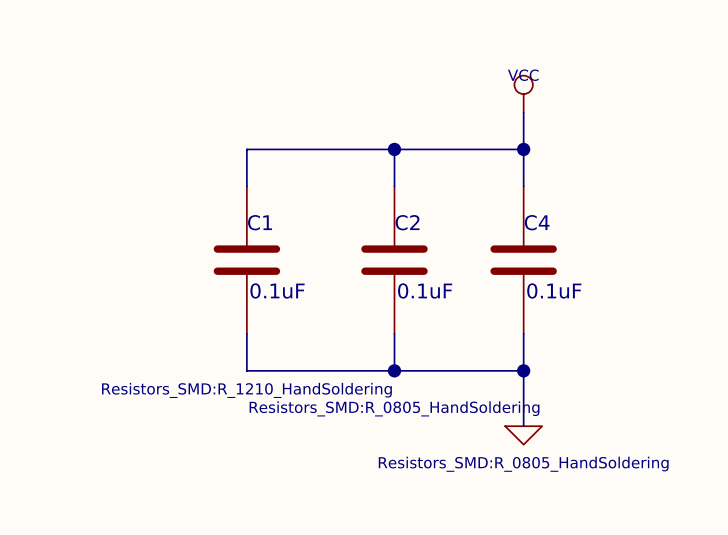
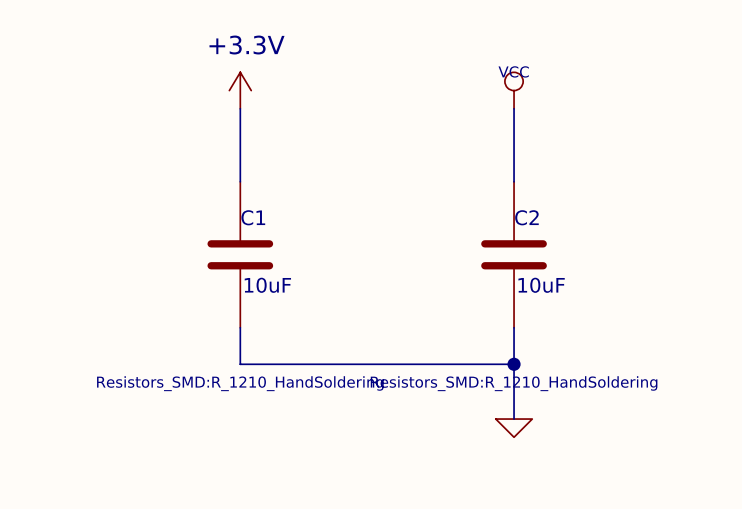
power symbol: none -> +3.3V (240, 90)
wire: (246, 149) (523, 149) -> (240, 145) (240, 108)
wire: (394, 149) (394, 186) -> none
junction: (394, 149) -> none
junction: (523, 149) -> none
C4 name: C4 (537, 222) -> C2 (526, 217)
C2: 0.1uF (394, 260) -> none
C1 value: 0.1uF (277, 290) -> 10uF (267, 285)
C4 value: 0.1uF (554, 290) -> 10uF (541, 285)
wire: (394, 333) (394, 370) -> none
junction: (394, 370) -> none
C4 text: Resistors_SMD:R_0805_HandSoldering (523, 464) -> Resistors_SMD:R_1210_HandSoldering (514, 383)

